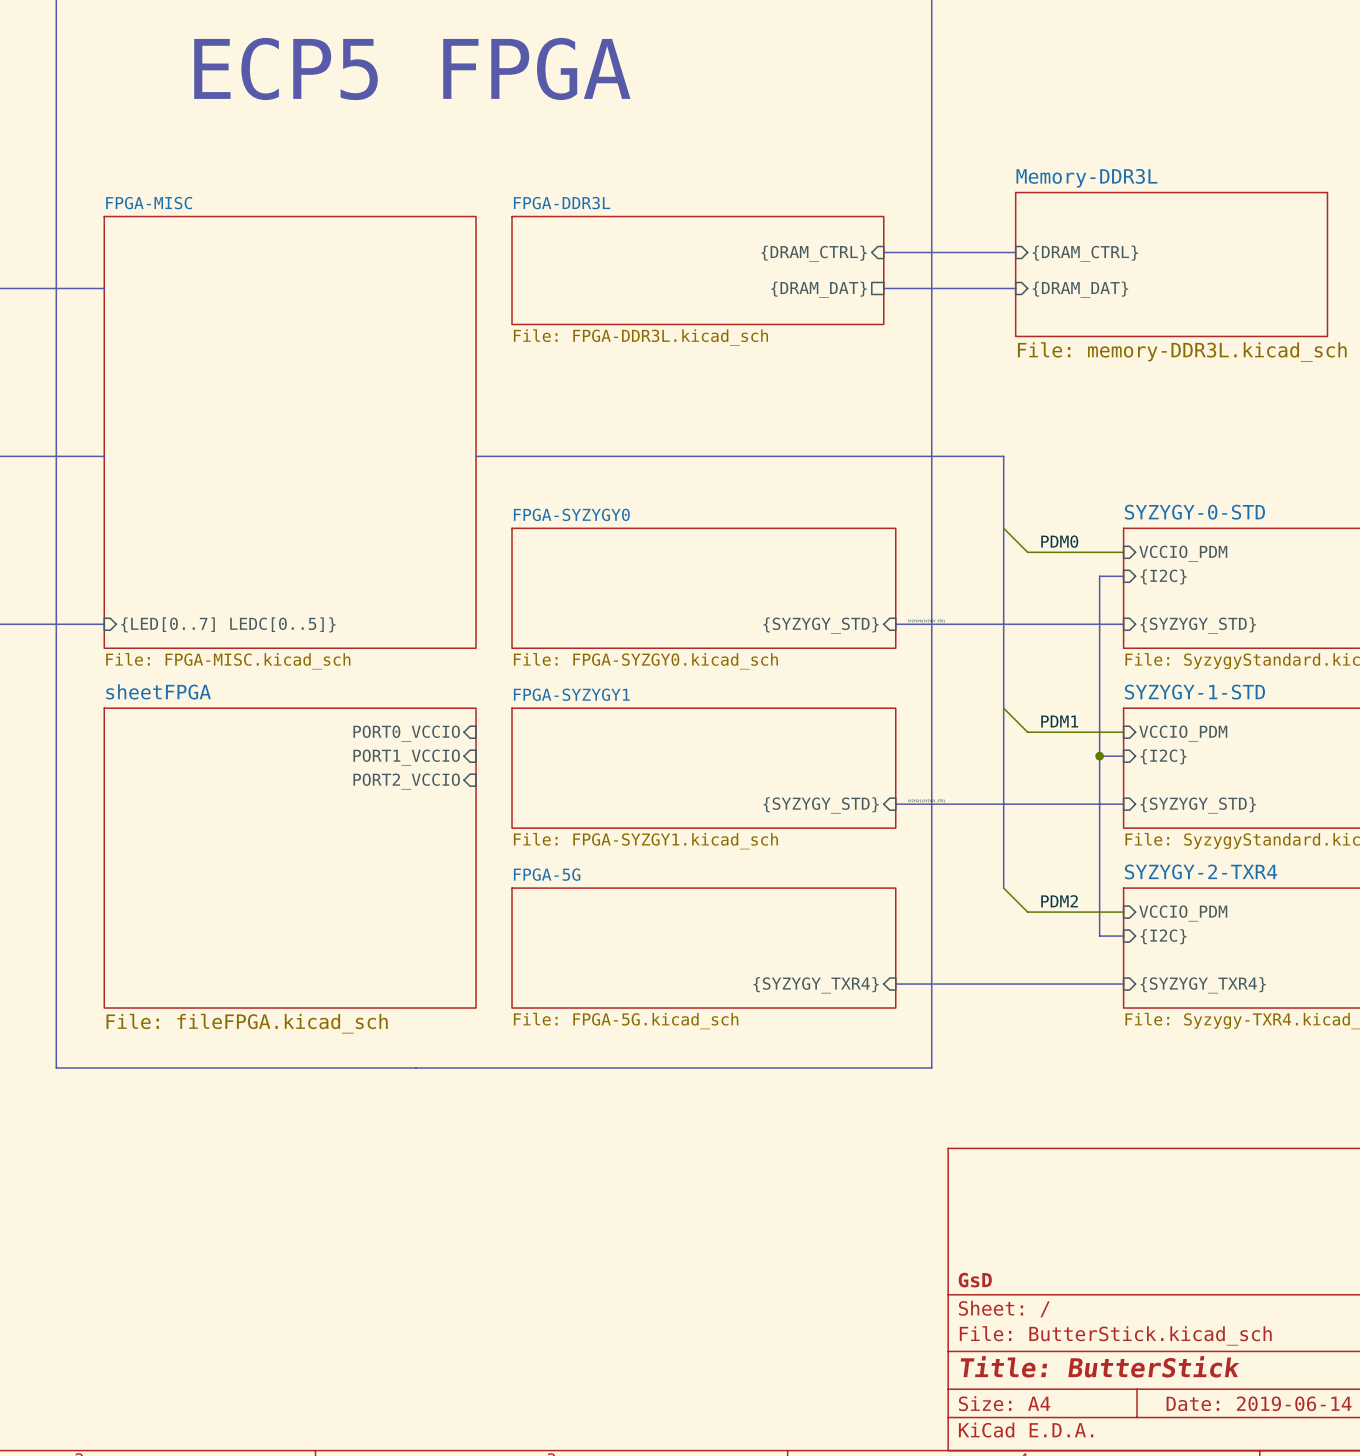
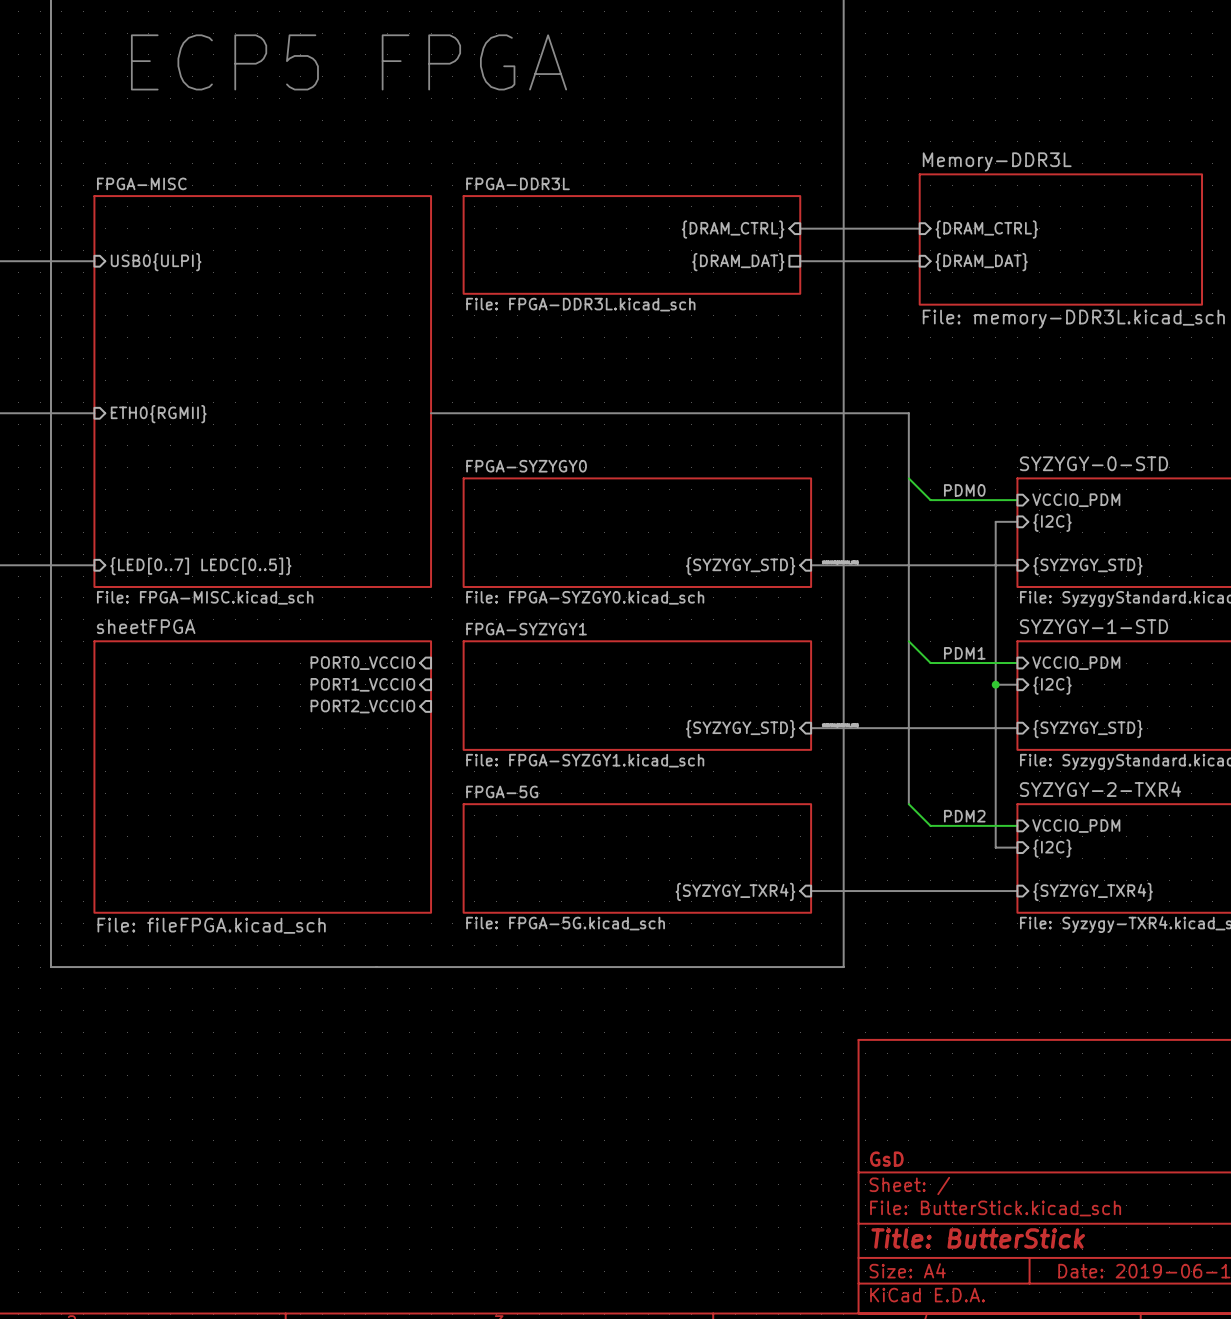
sheet pin: none -> USB0{ULPI} (156, 262)
sheet pin: none -> ETH0{RGMII} (158, 414)

